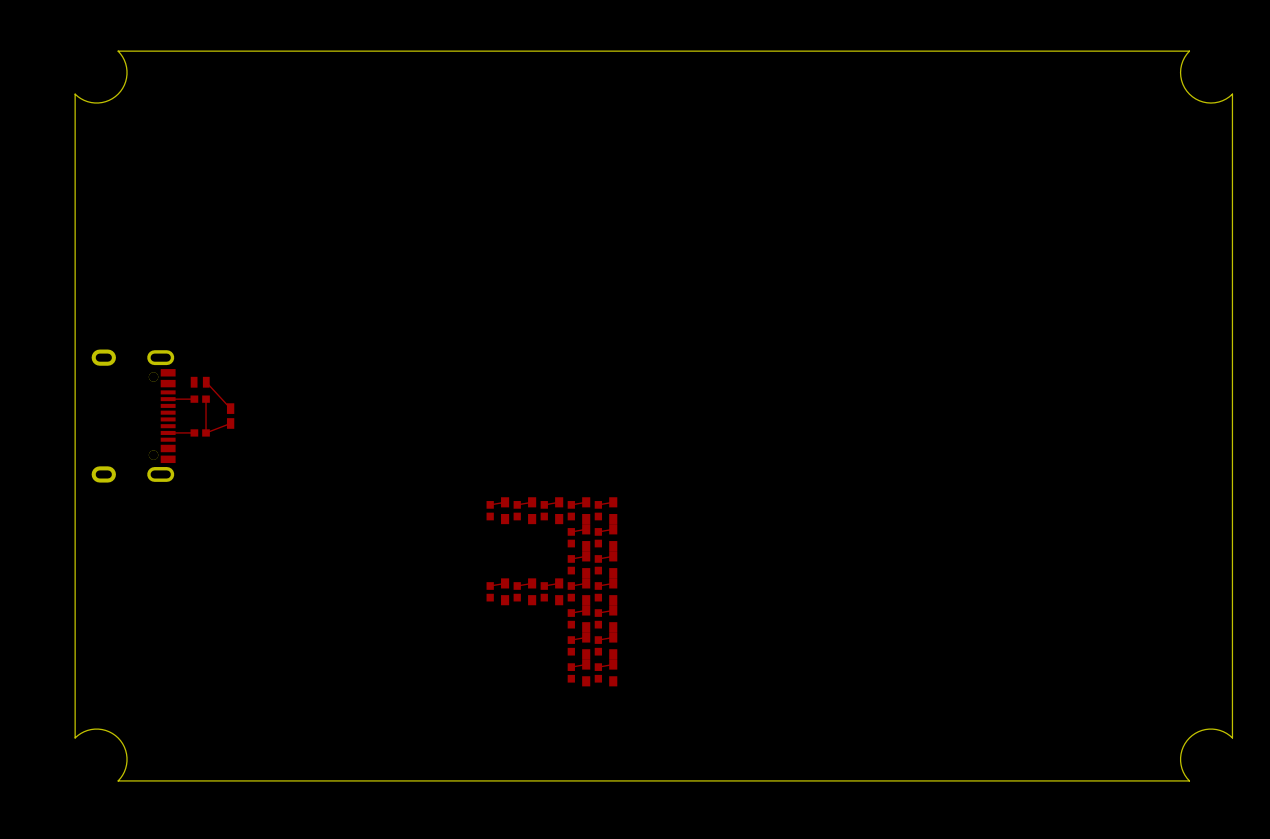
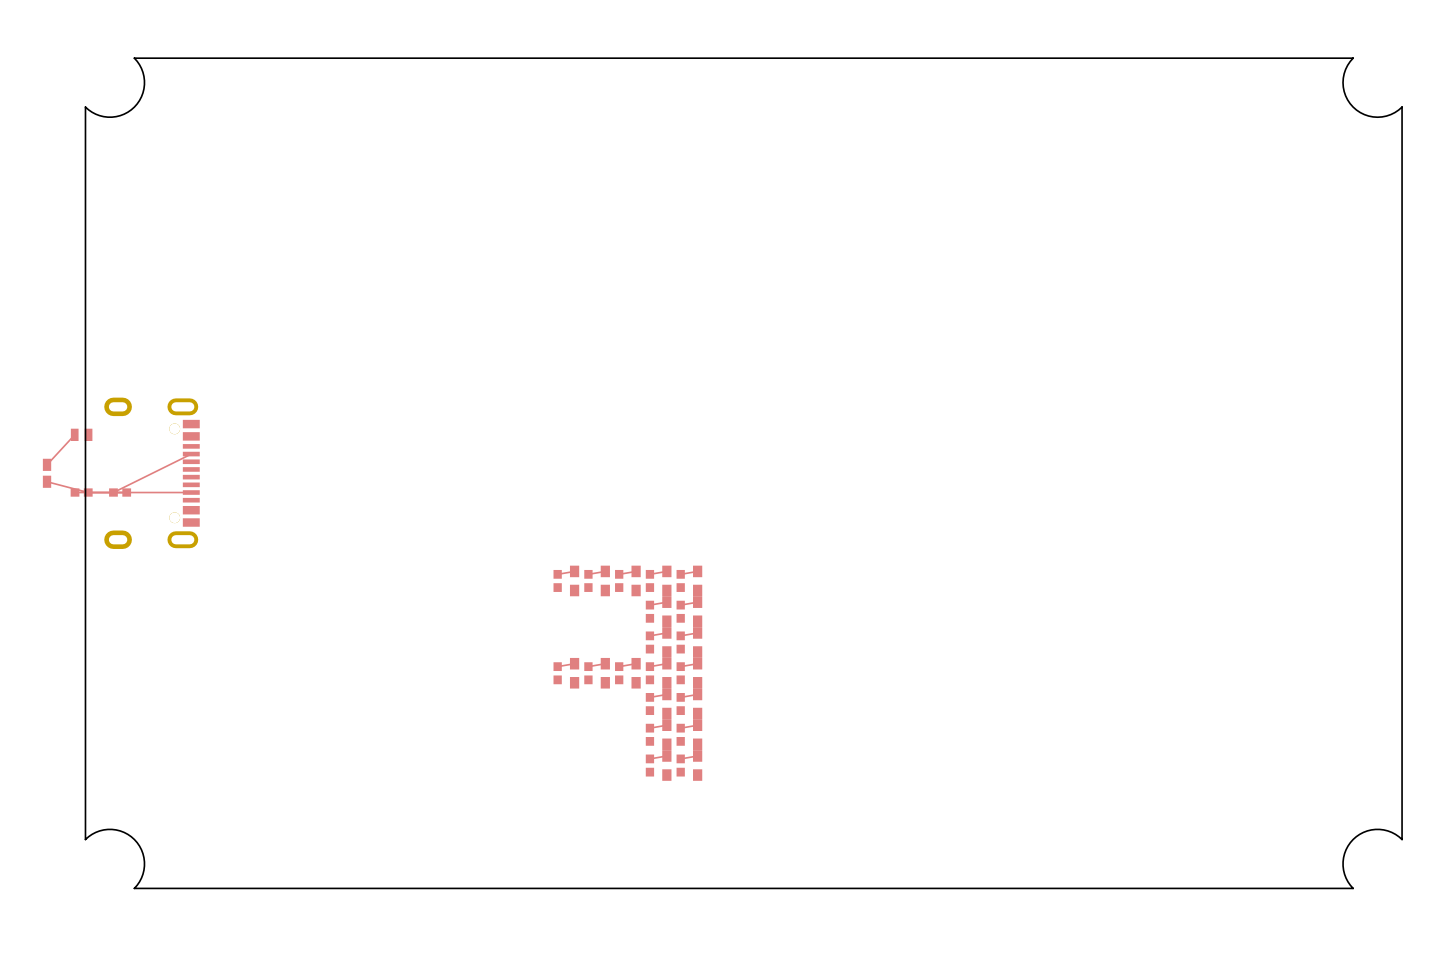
top track: none -> (74, 434) (47, 464)
part position: (200, 382) -> (81, 434)
top track: (206, 382) (230, 408) -> none
top track: (194, 399) (168, 399) -> (113, 492) (191, 454)
part: (200, 399) -> none
top track: (206, 399) (206, 432) (230, 423) -> none
part position: (230, 416) -> (47, 473)
top track: none -> (47, 481) (88, 492)
part: none -> (81, 492)
part: none -> (120, 492)
top track: (194, 432) (168, 432) -> (75, 492) (191, 492)
part: (200, 432) -> none

